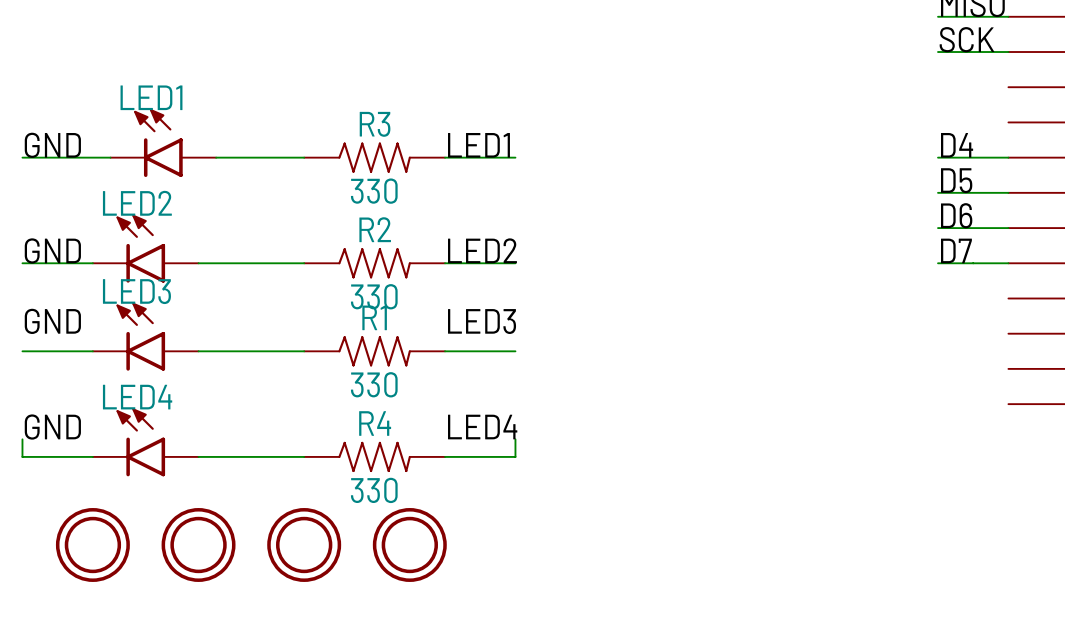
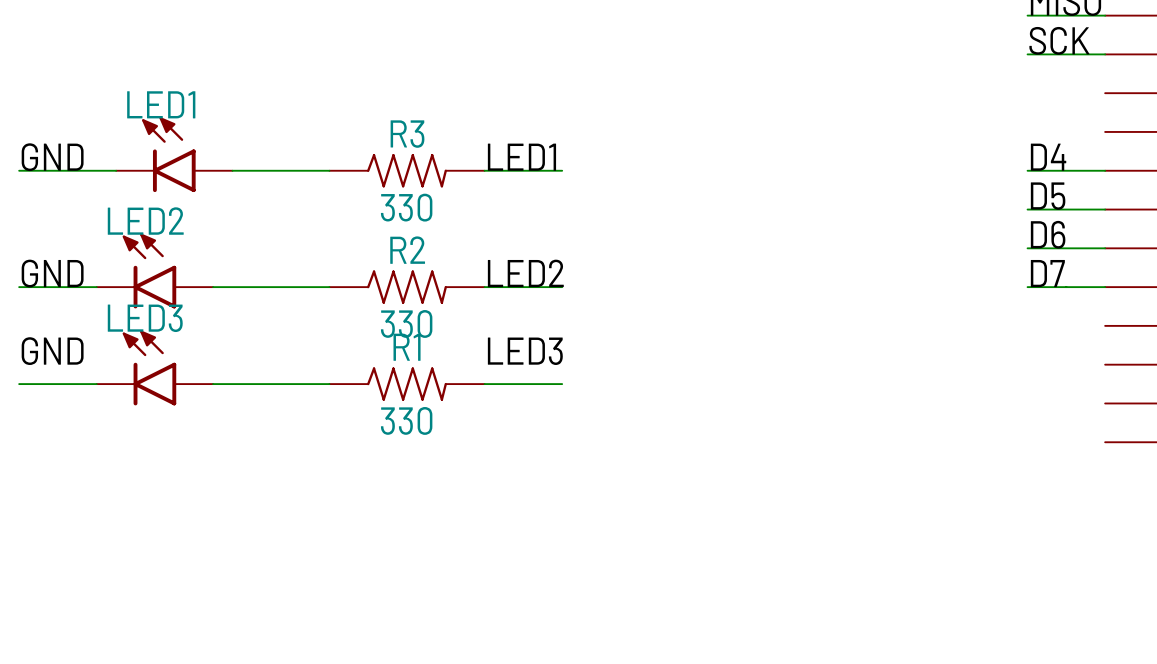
label: GND (52, 427) -> none
label: LED4 (482, 427) -> none
wire: (22, 439) (22, 456) (92, 456) -> none
wire: (515, 439) (515, 456) (445, 456) -> none
LED4: (145, 442) -> none
wire: (198, 456) (304, 456) -> none
R4: 330 (374, 456) -> none
part: (92, 544) -> none
part: (198, 544) -> none
part: (304, 544) -> none
part: (409, 544) -> none

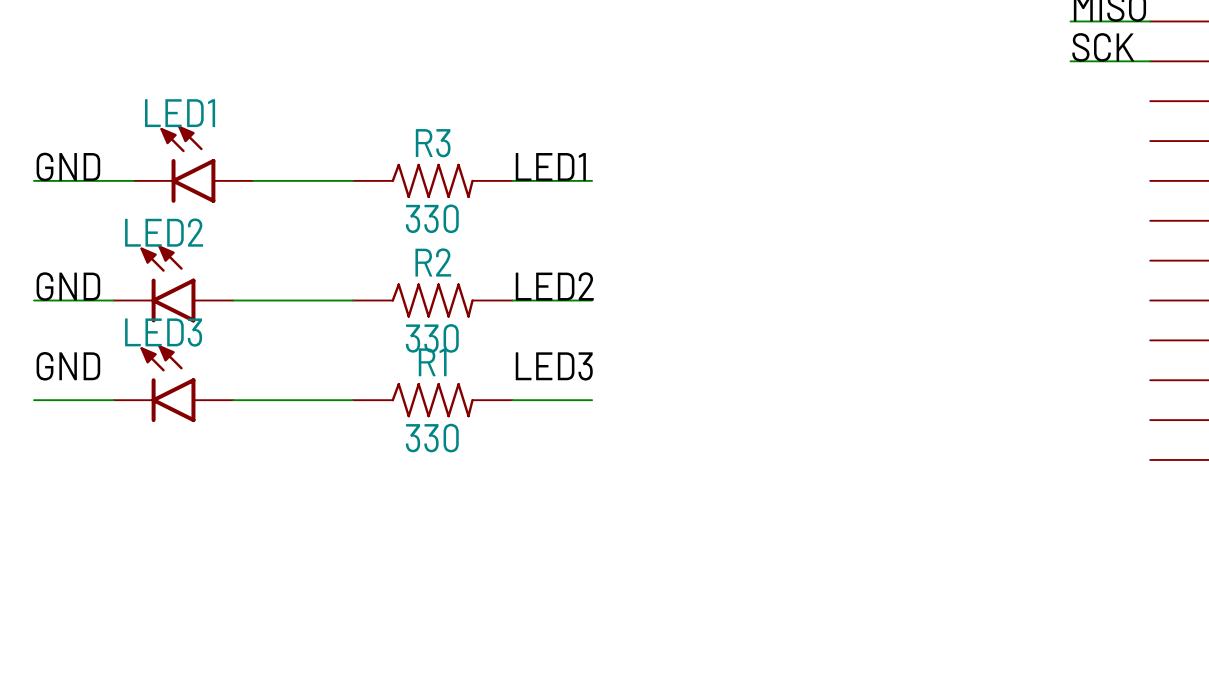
label: D4 (1048, 157) -> none
wire: (1027, 170) (1105, 170) -> none
label: D5 (1048, 196) -> none
wire: (1027, 209) (1105, 209) -> none
label: D6 (1048, 234) -> none
wire: (1027, 248) (1105, 248) -> none
label: D7 (1047, 273) -> none
wire: (1027, 287) (1105, 287) -> none

